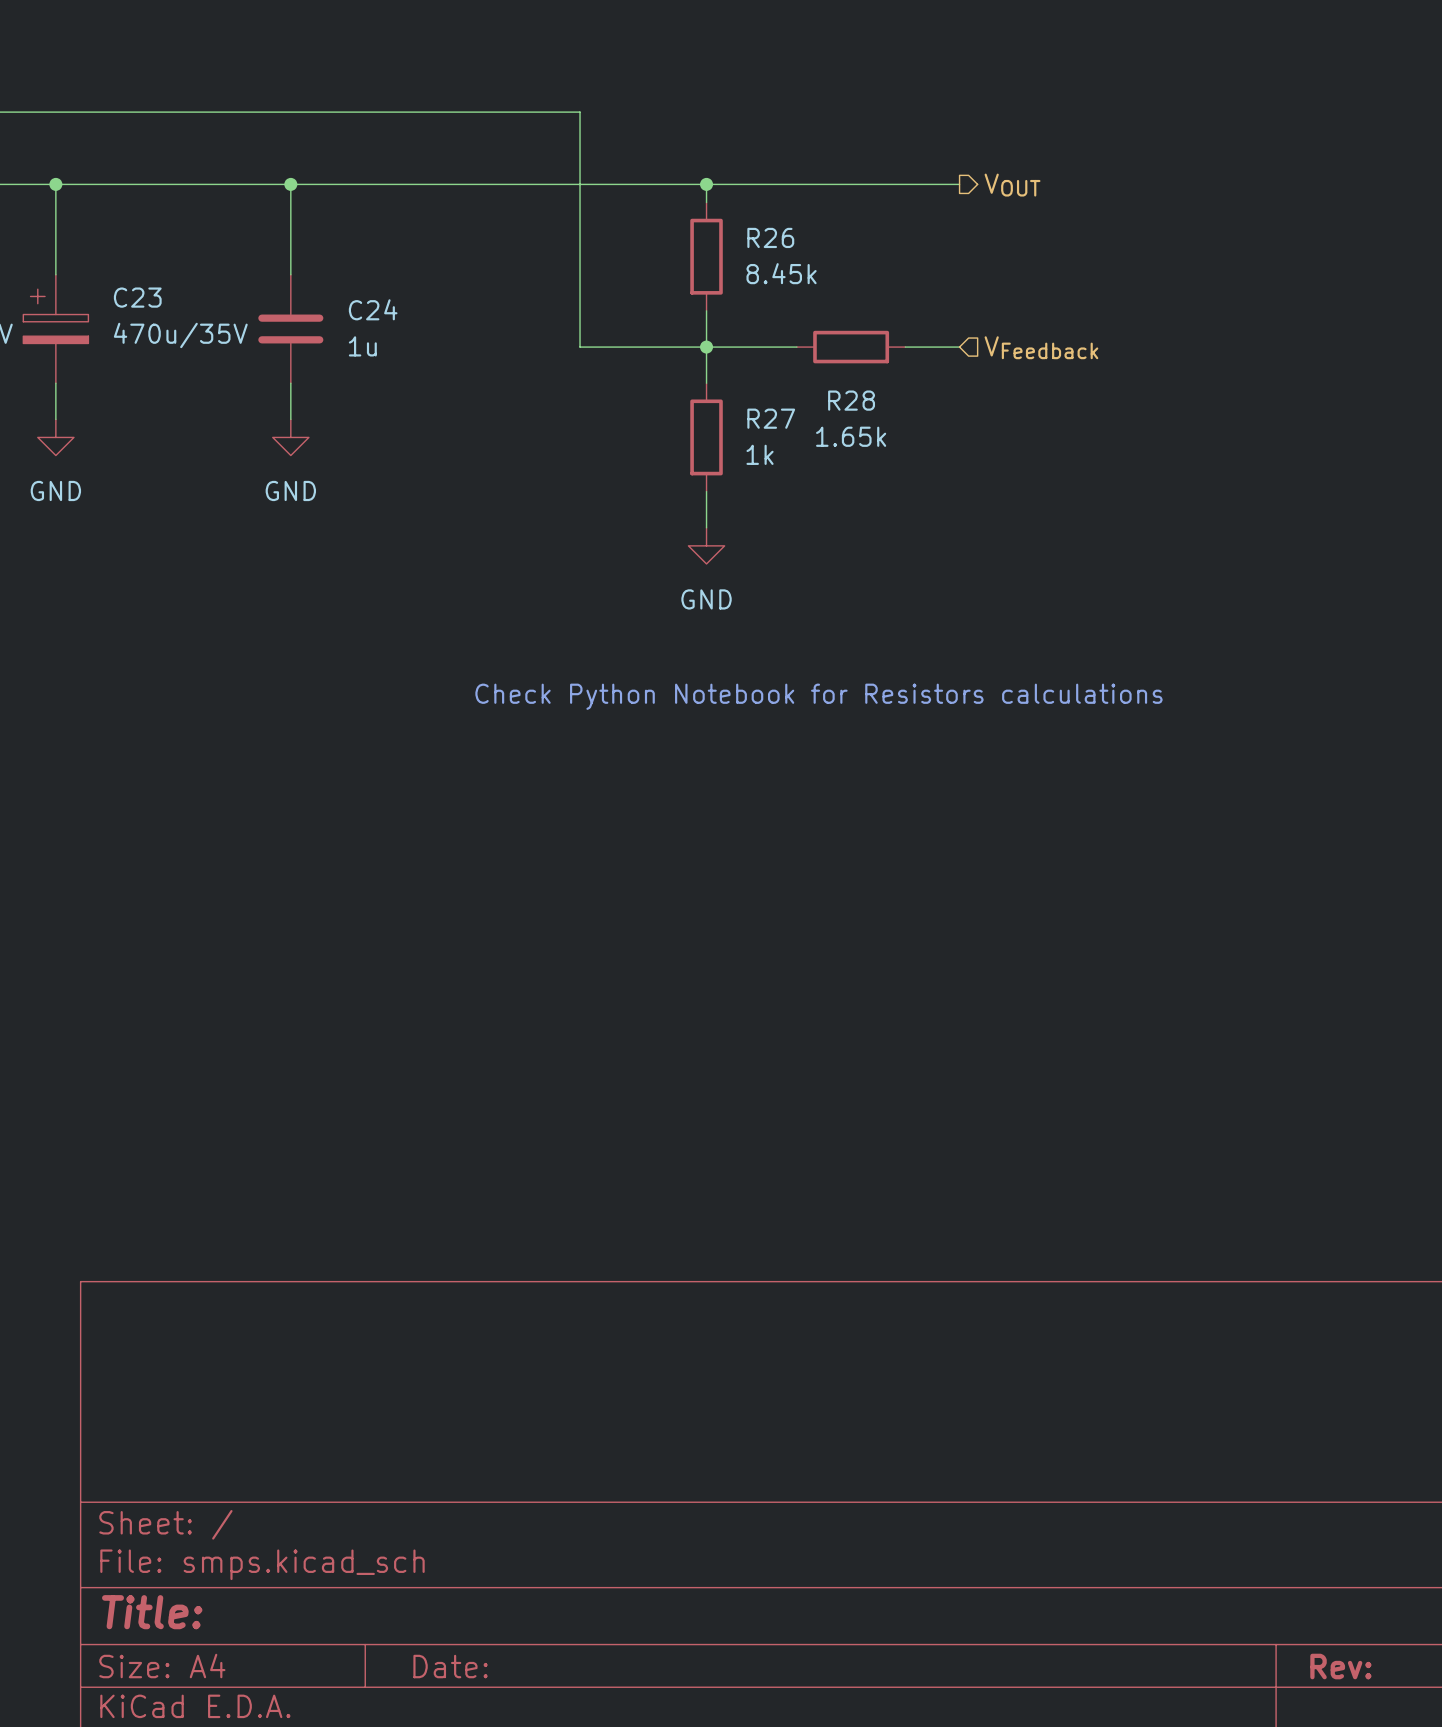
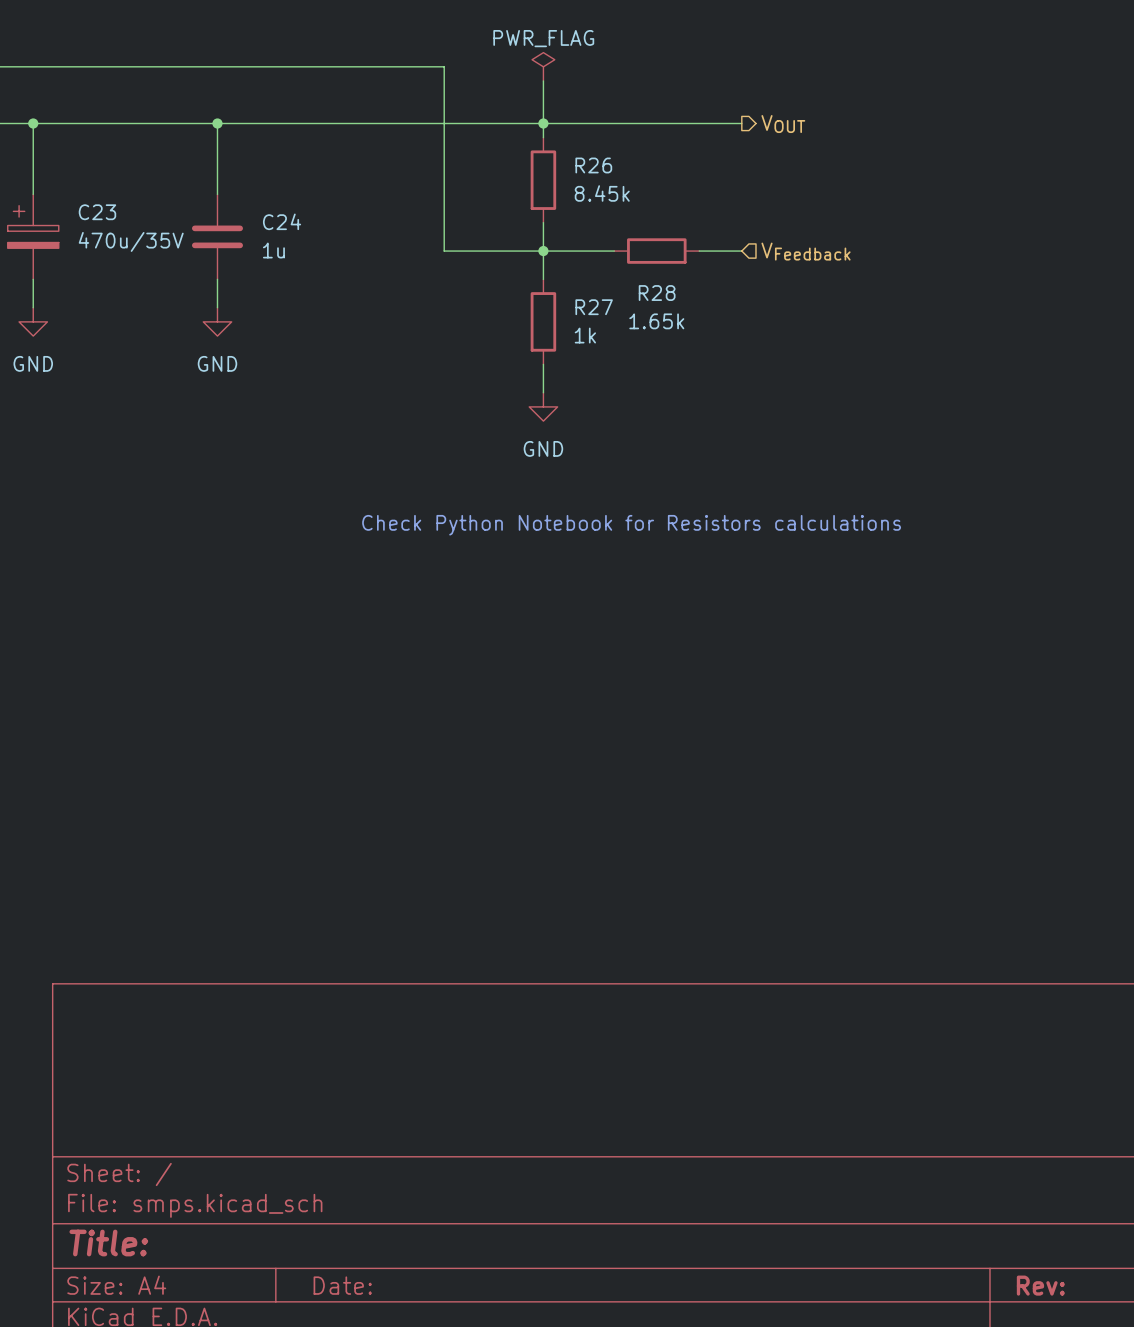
power symbol: none -> PWR_FLAG (543, 66)
wire: none -> (543, 80) (543, 123)

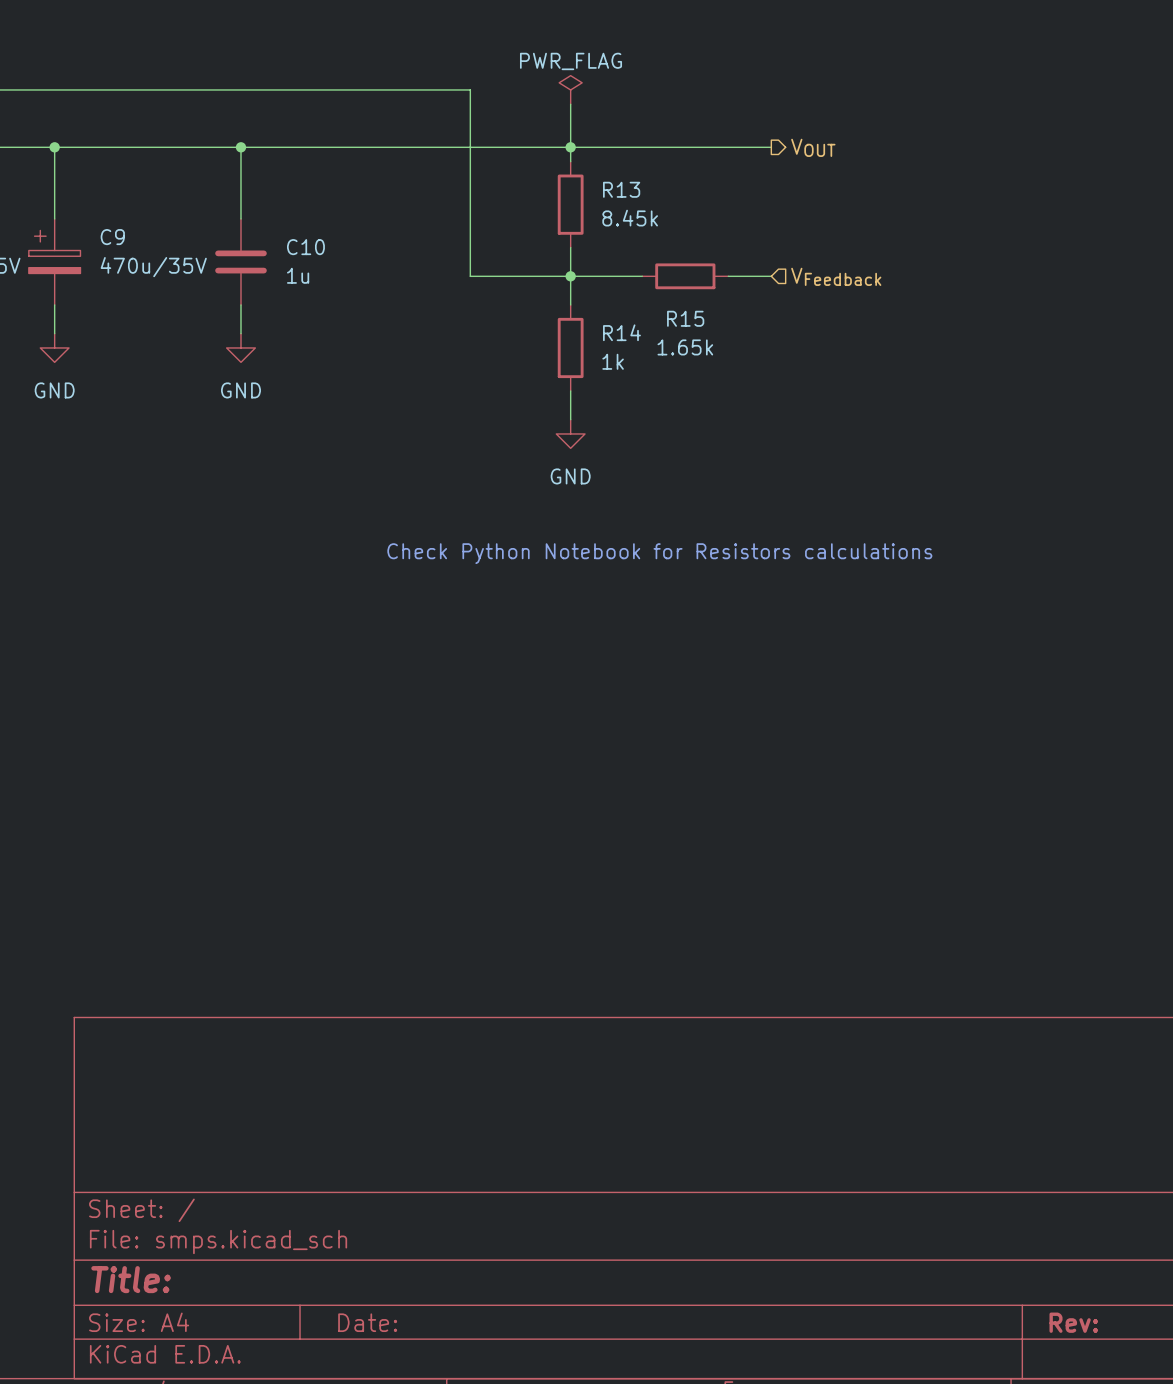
R26 name: R26 (593, 165) -> R13 (621, 189)
C23 name: C23 (97, 212) -> C9 (112, 237)
C24 name: C24 (282, 221) -> C10 (305, 247)
R28 name: R28 (657, 293) -> R15 (685, 318)
R27 name: R27 (594, 307) -> R14 (621, 332)

